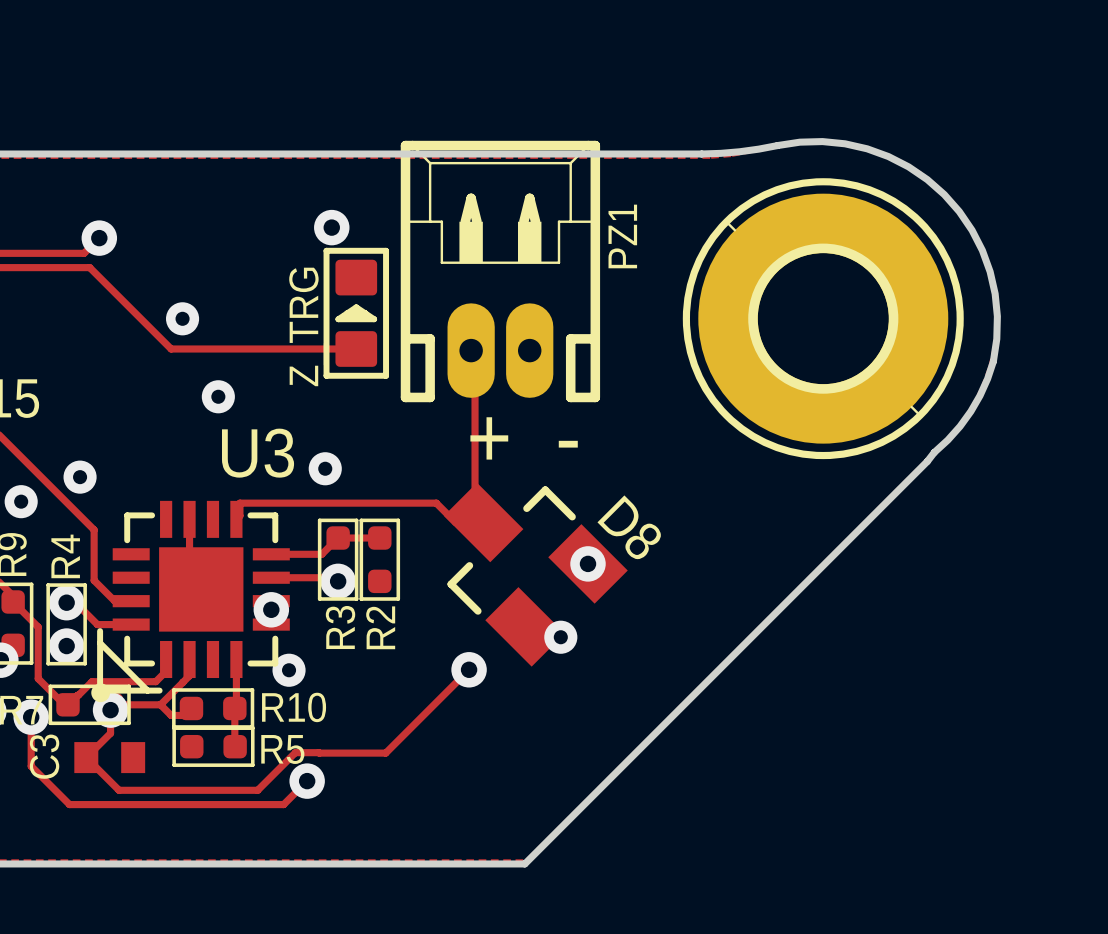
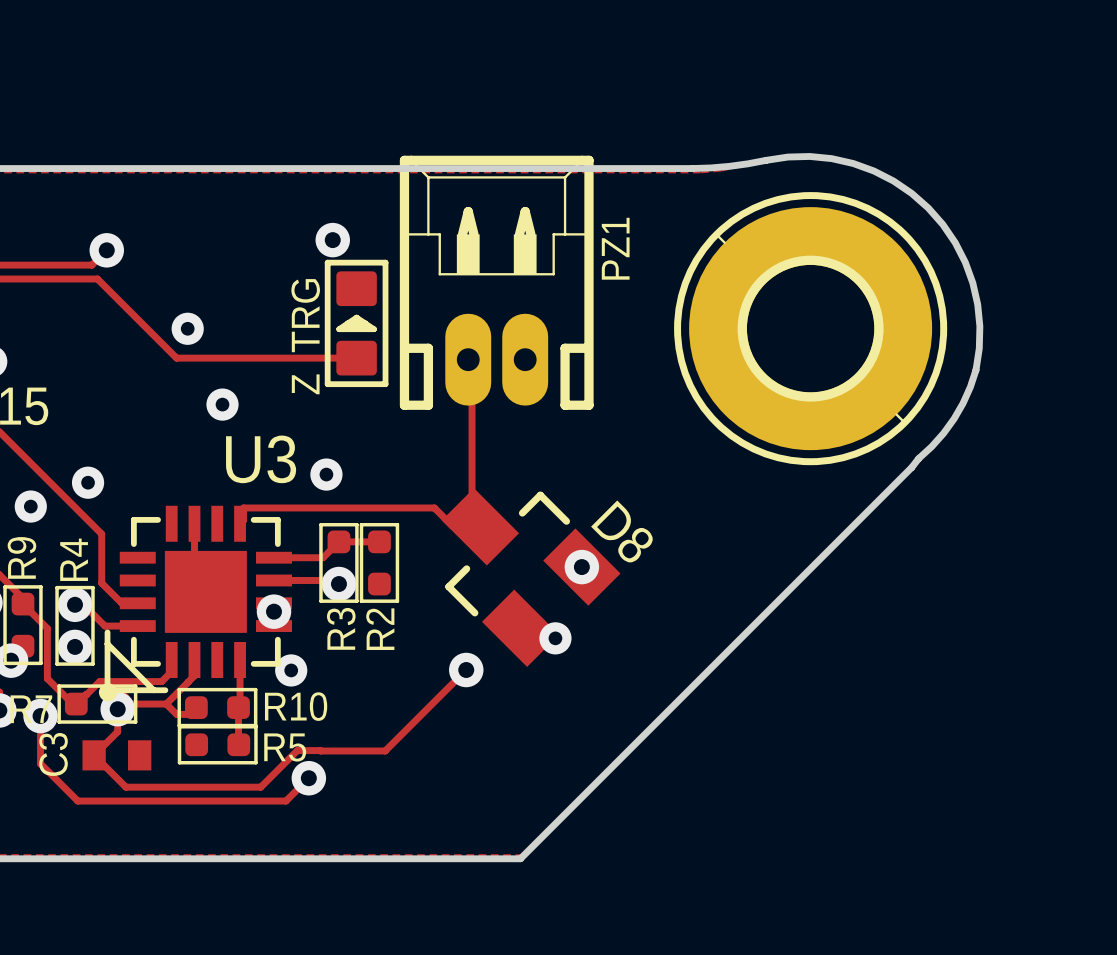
text: + - (524, 438) -> none

